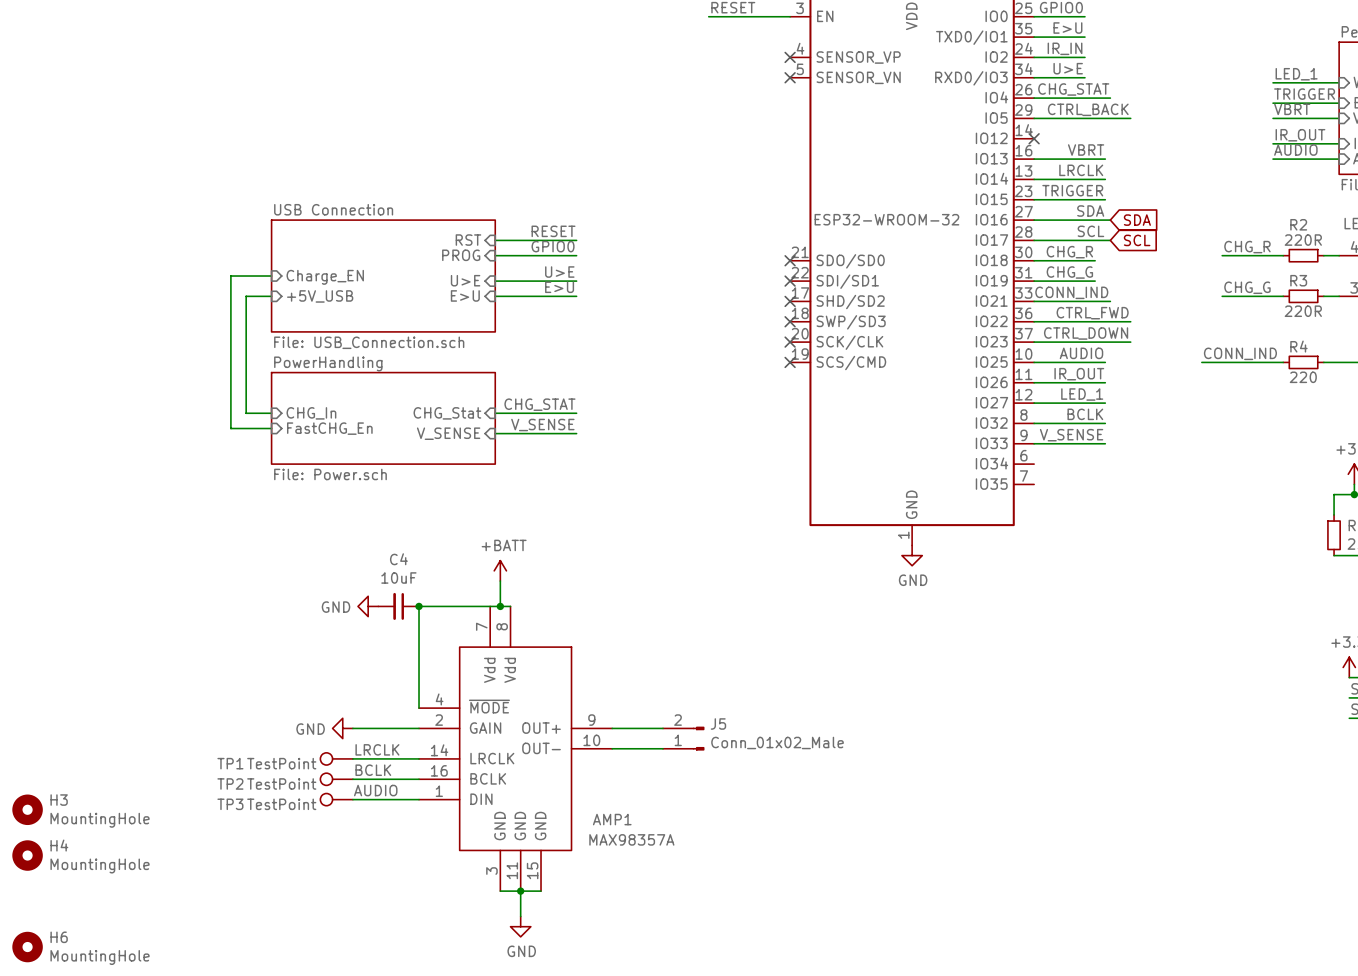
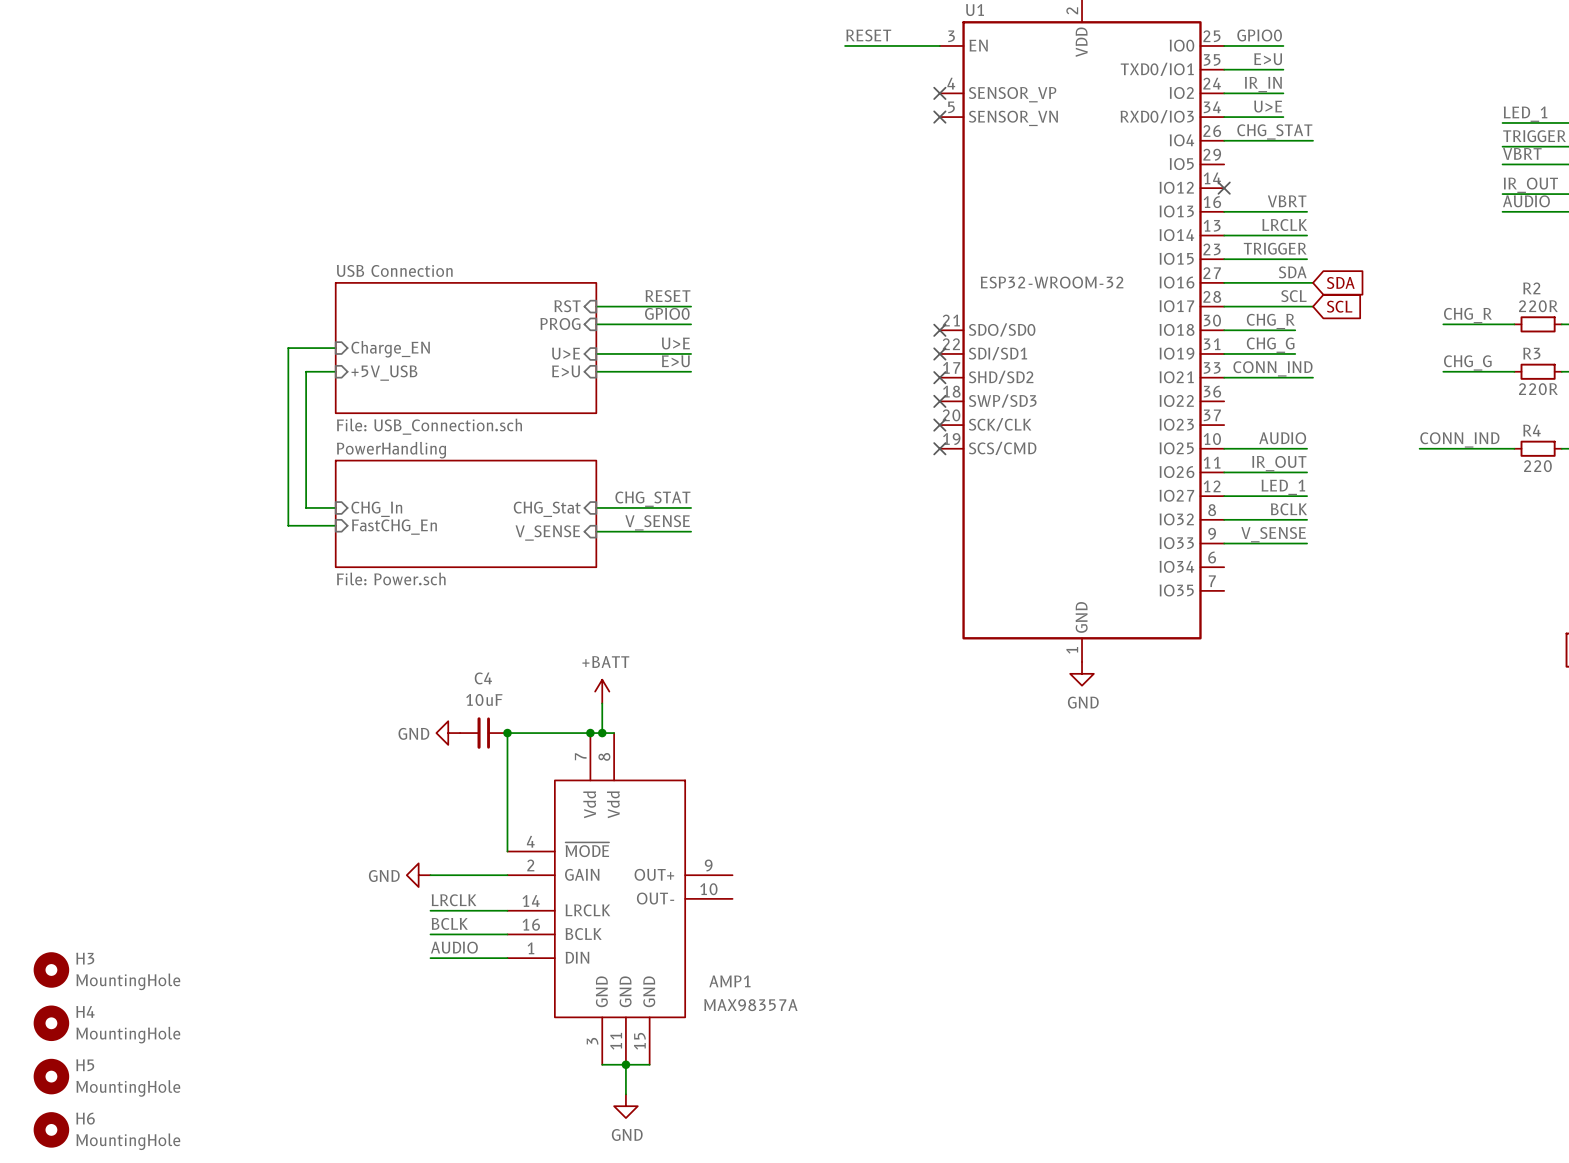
label: CTRL_BACK (1088, 109) -> none
wire: (1034, 118) (1130, 118) -> none
label: CTRL_FWD (1092, 313) -> none
wire: (1034, 321) (1130, 321) -> none
label: CTRL_DOWN (1086, 333) -> none
wire: (1034, 342) (1130, 342) -> none
junction: none -> (590, 733)
wire: (612, 728) (663, 728) -> none
J5: Conn_01x02_Male (683, 738) -> none
wire: (612, 748) (663, 748) -> none
TP1: TestPoint (336, 758) -> none
TP2: TestPoint (336, 779) -> none
TP3: TestPoint (336, 799) -> none
H5: none -> MountingHole (51, 1076)

